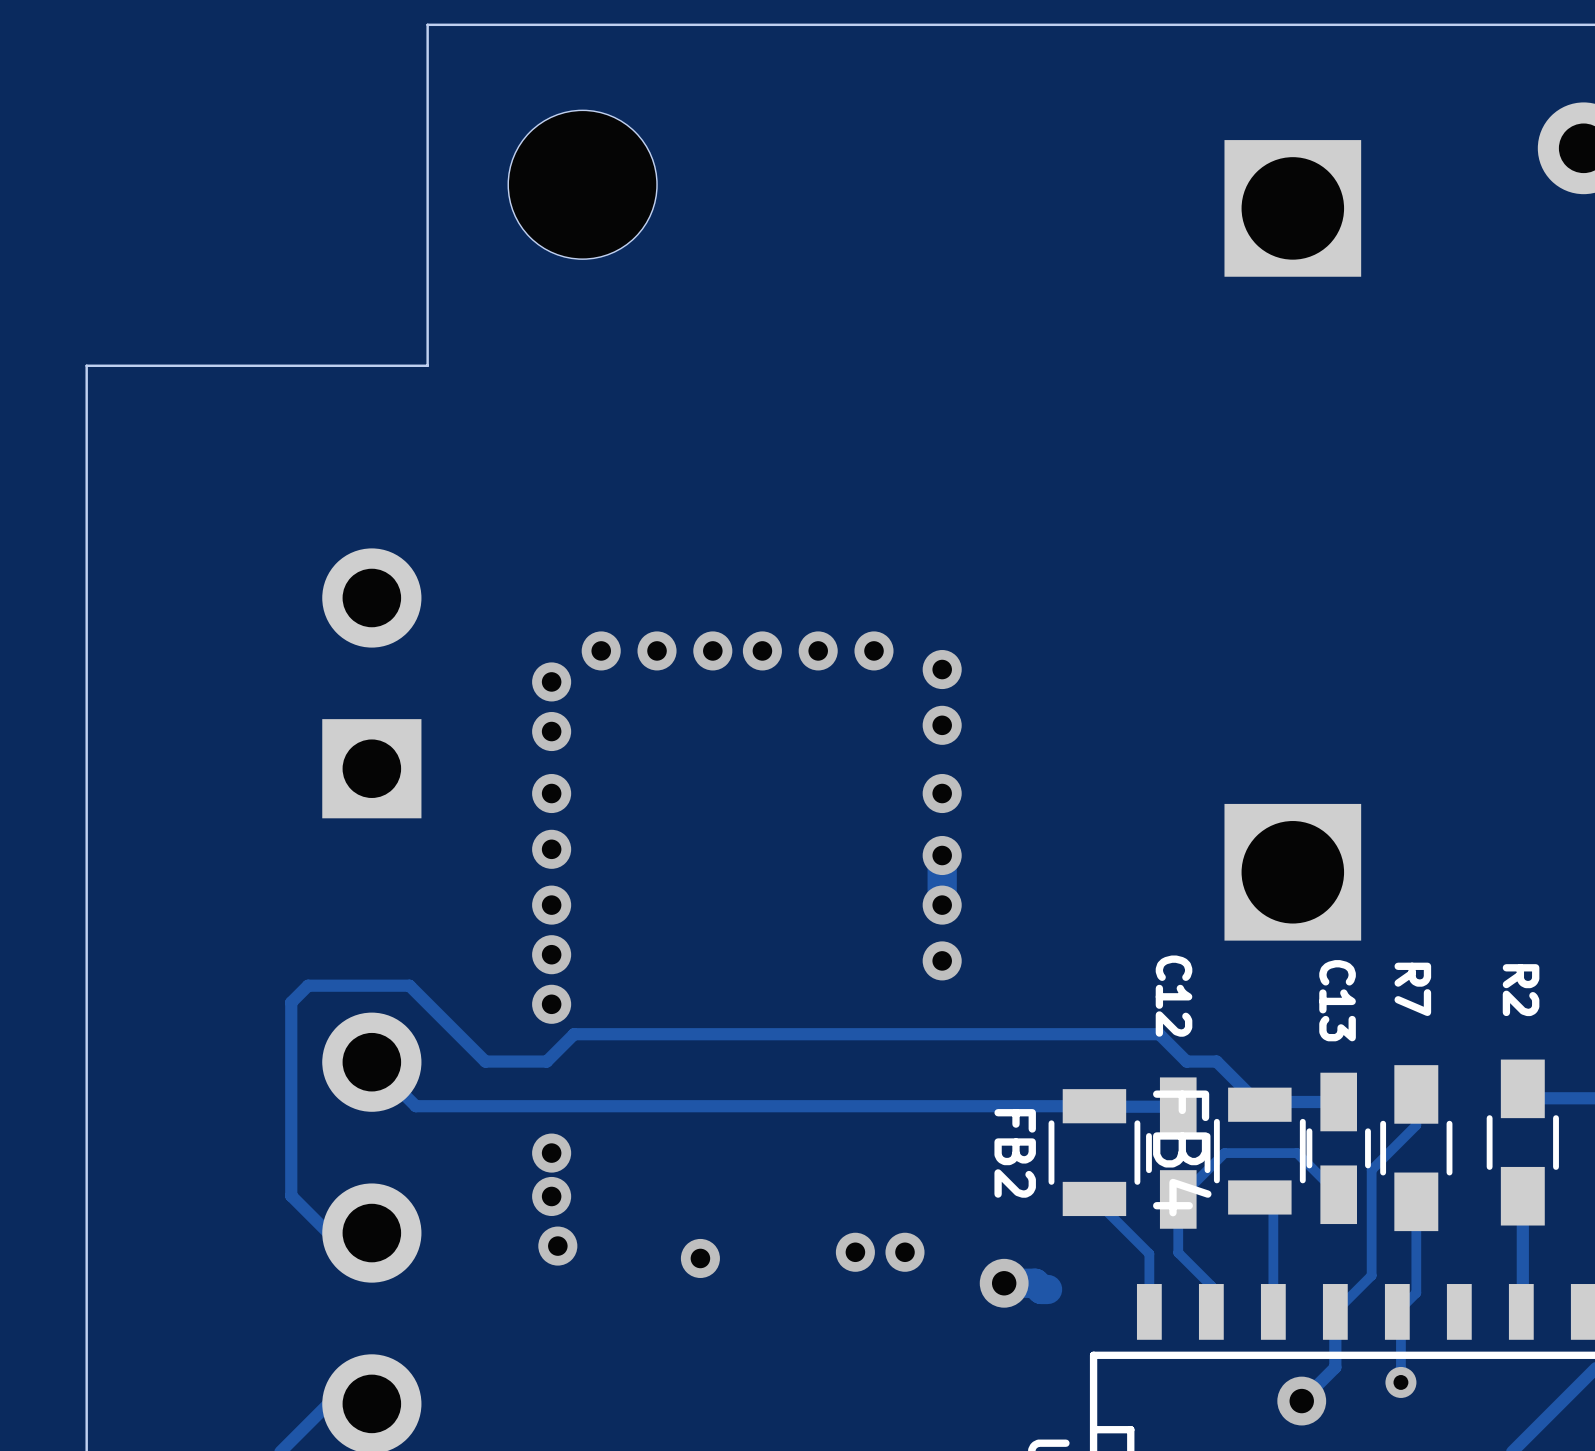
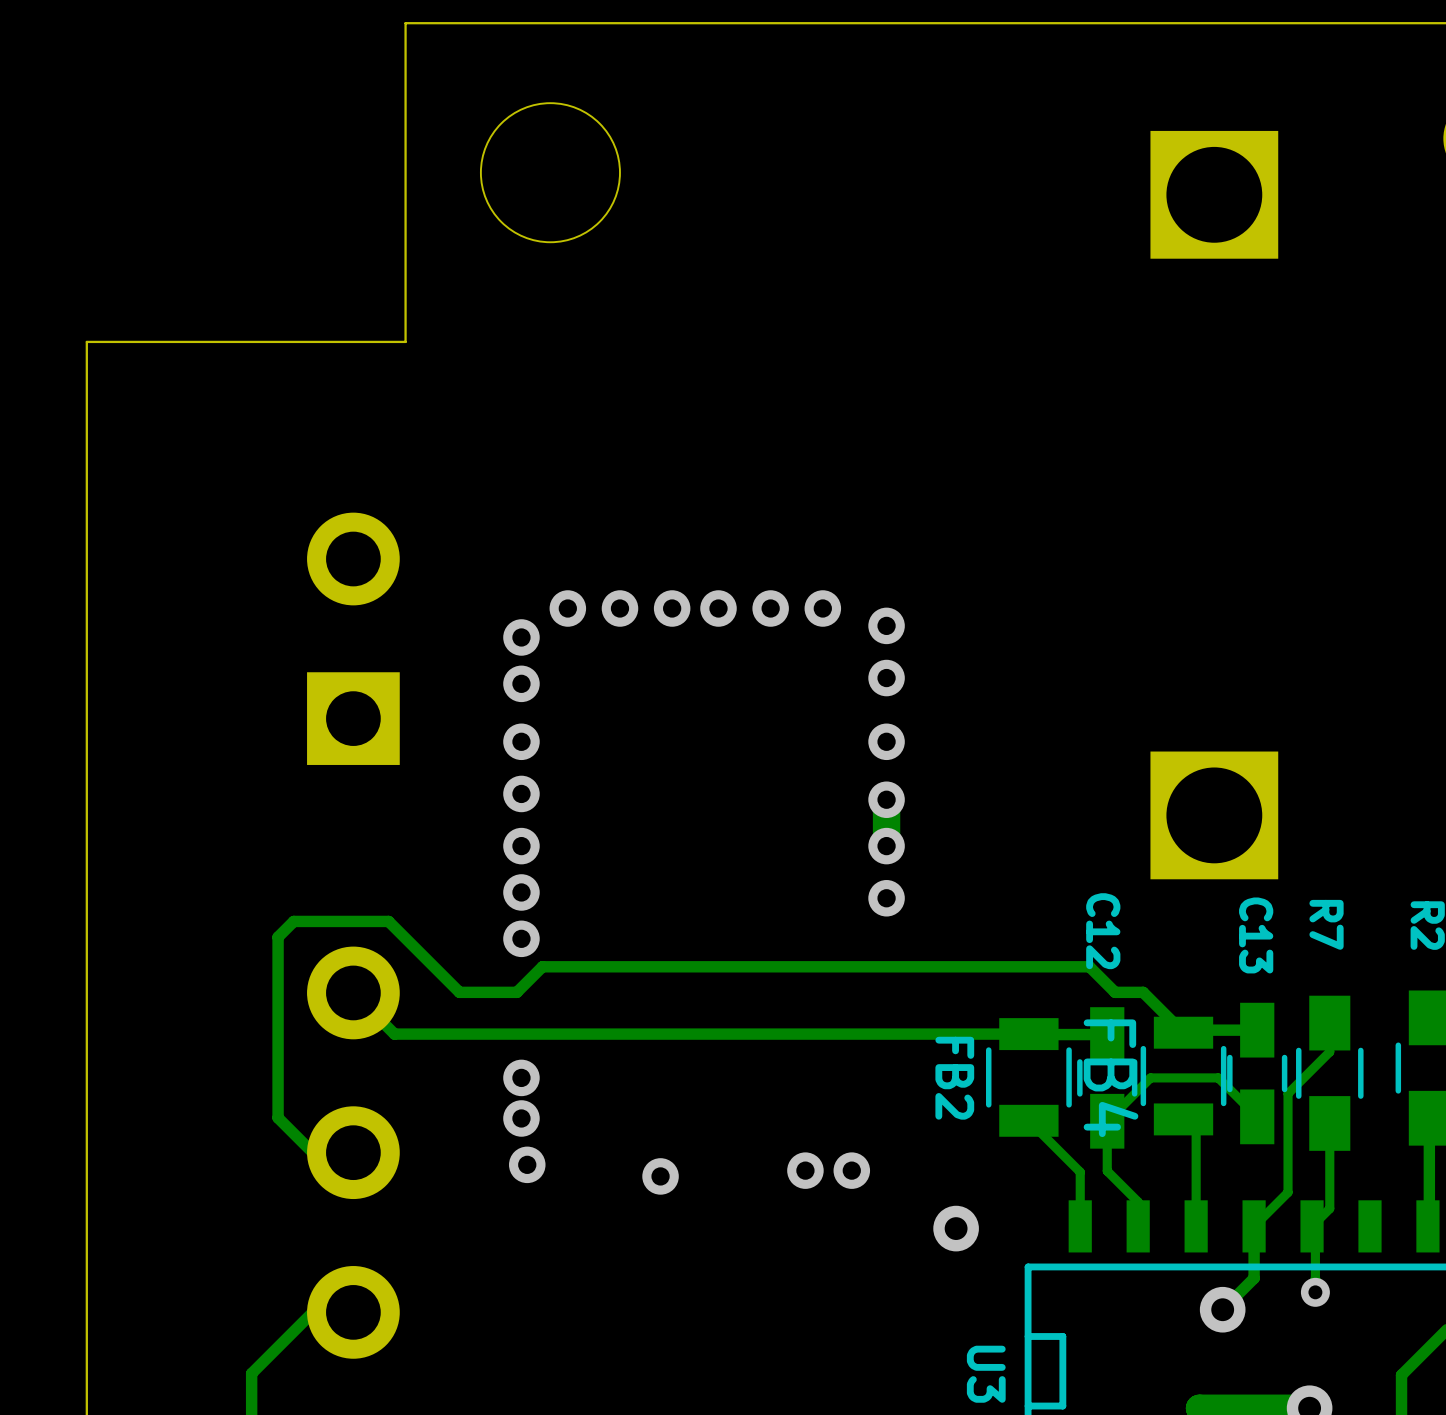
track: (1004, 1283) (1035, 1283) (1041, 1289) (1047, 1289) -> none
via position: (1004, 1283) -> (956, 1228)

